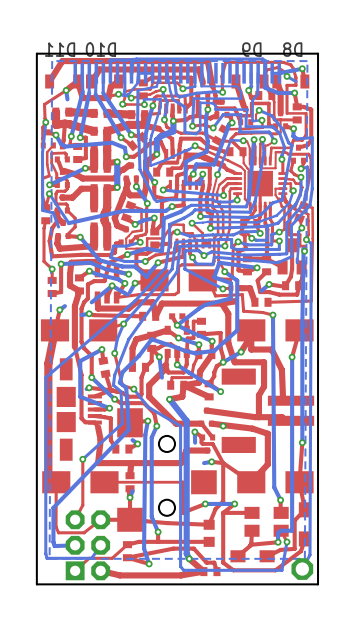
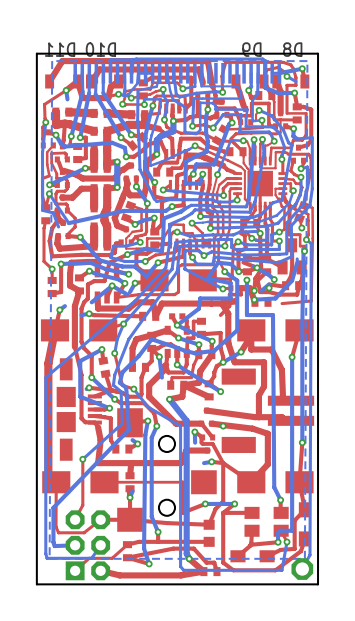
bottom track: (301, 228) (298, 232) (297, 262) -> (254, 299) (275, 298) (292, 280) (297, 262)
top track: none -> (260, 233) (261, 269) (255, 278) (254, 290) (240, 288) (241, 294) (229, 294) (229, 306) (220, 315)
top track: none -> (243, 262) (253, 266)
bottom track: none -> (253, 266) (274, 279)
bottom track: (257, 267) (219, 262) (214, 277) (230, 283) (230, 298) (205, 304) (198, 308) -> (238, 271) (230, 264) (218, 262) (207, 278) (230, 283) (230, 298) (200, 298) (198, 308)
via: none -> (238, 271)
top track: (207, 278) (215, 295) (242, 294) (243, 311) (272, 315) -> none
via: none -> (274, 279)
bottom track: none -> (246, 280) (246, 315) (272, 315)
via: none -> (246, 280)
via: (269, 284) -> none
via: none -> (269, 288)
via: none -> (254, 290)
via: none -> (254, 299)
top track: (311, 301) (268, 302) -> (311, 301) (282, 303)
via: (272, 315) -> none

